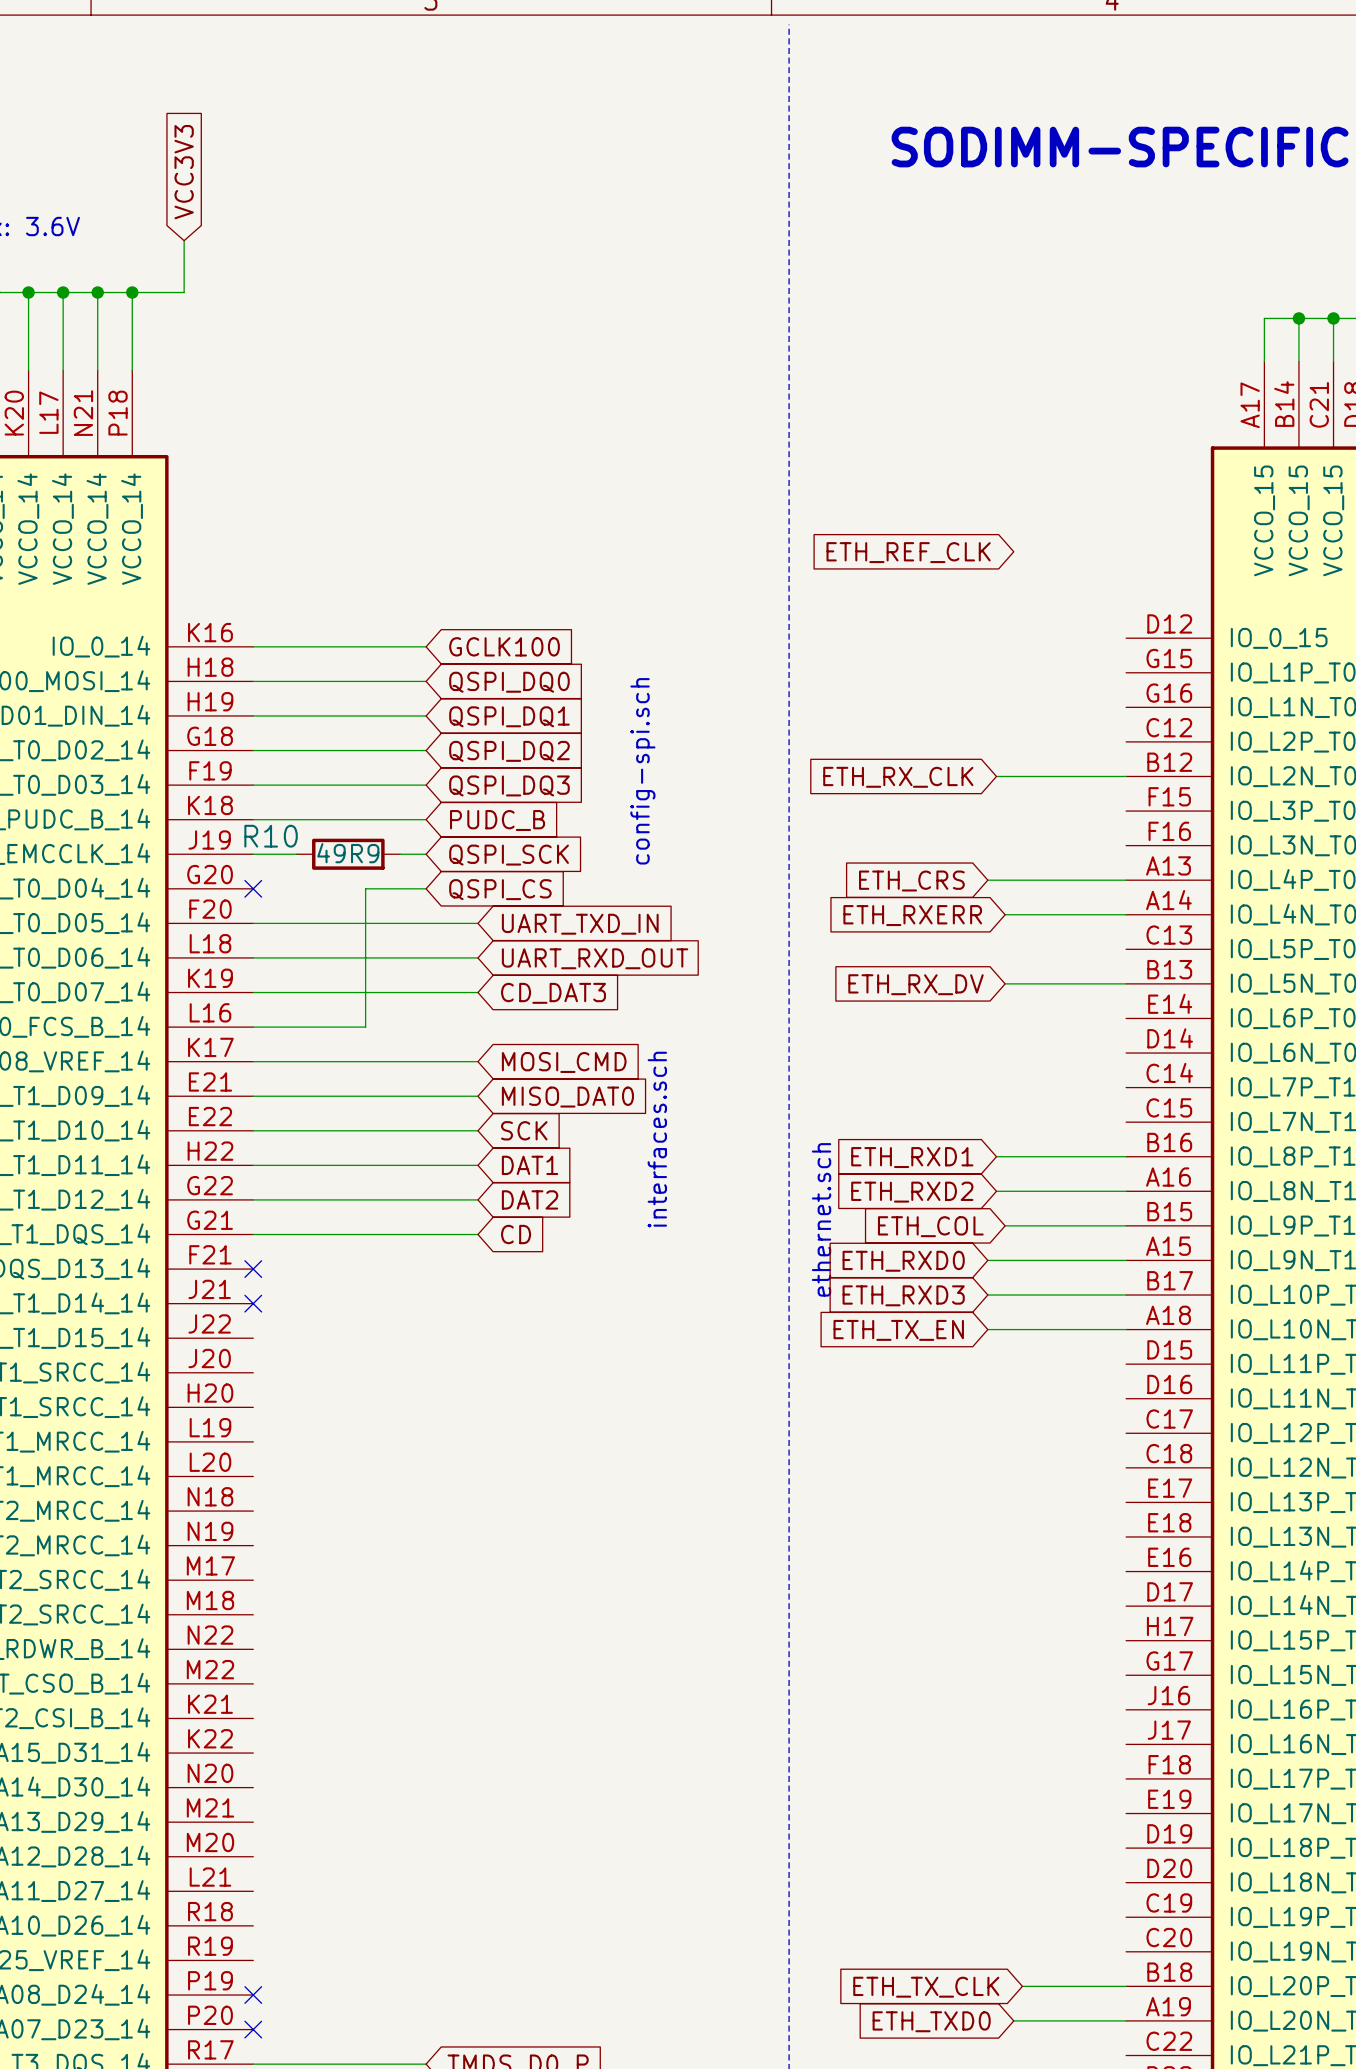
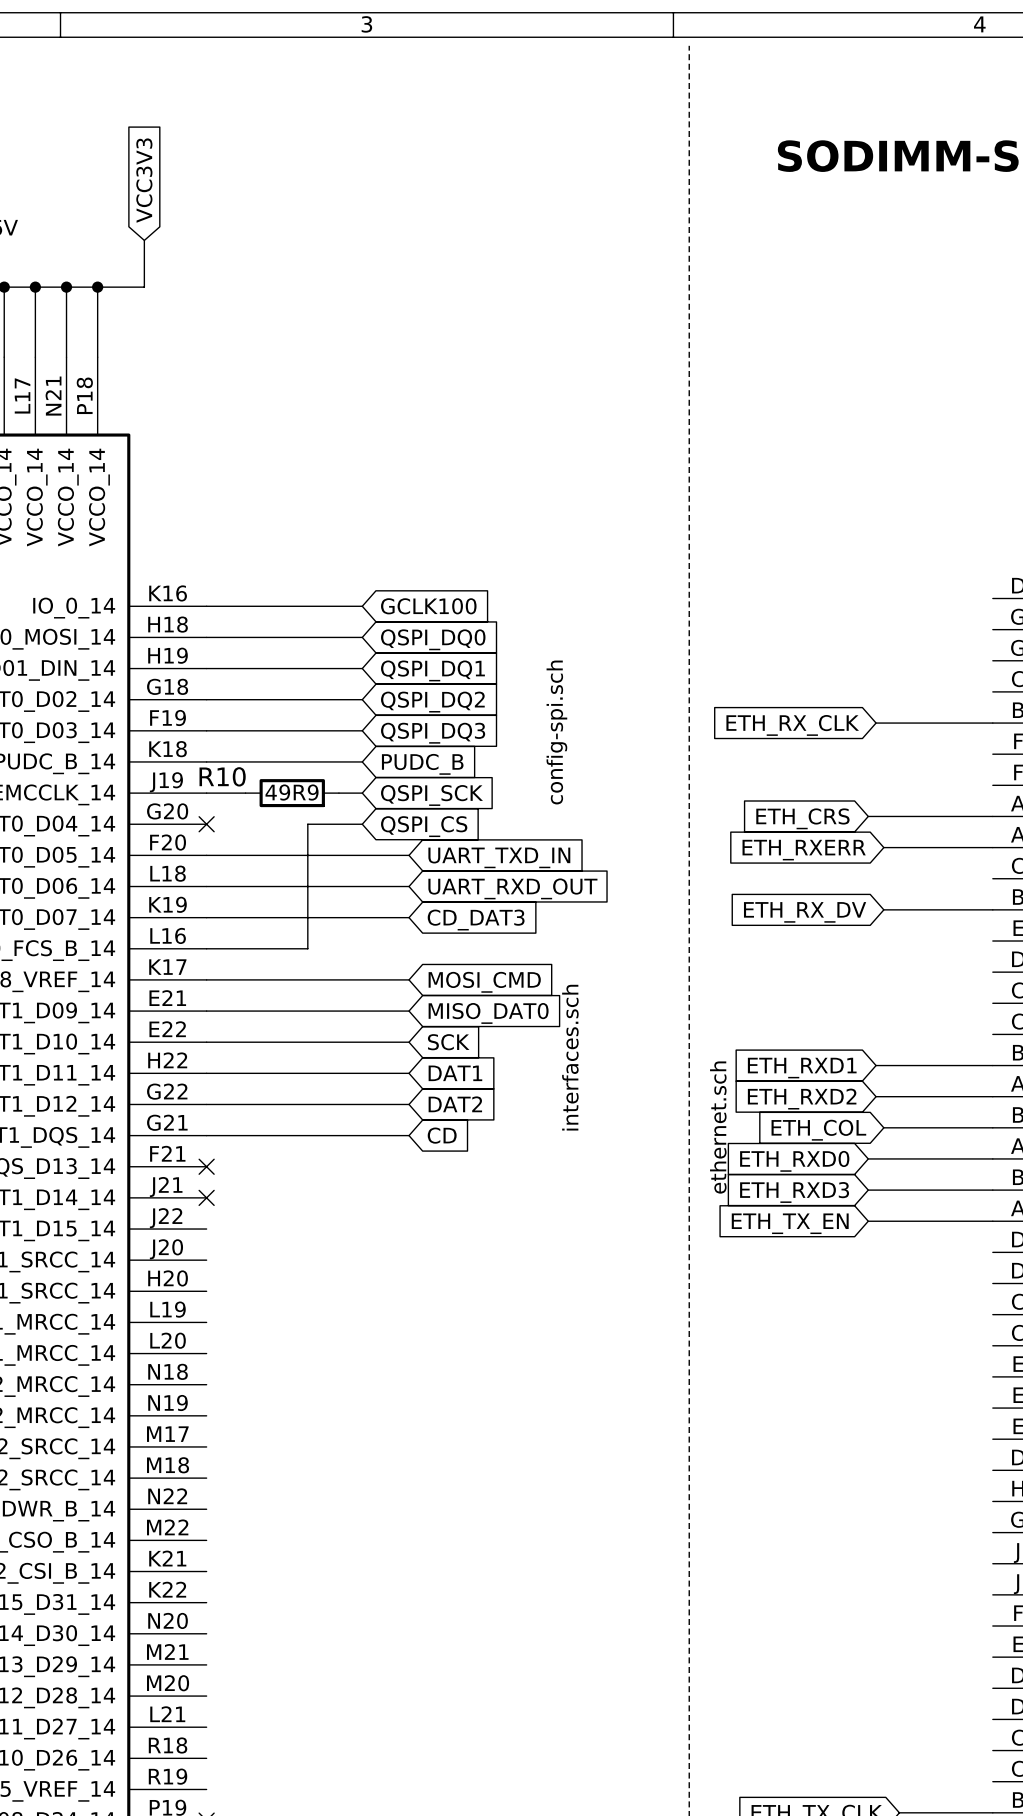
global label: ETH_REF_CLK (908, 552) -> none

